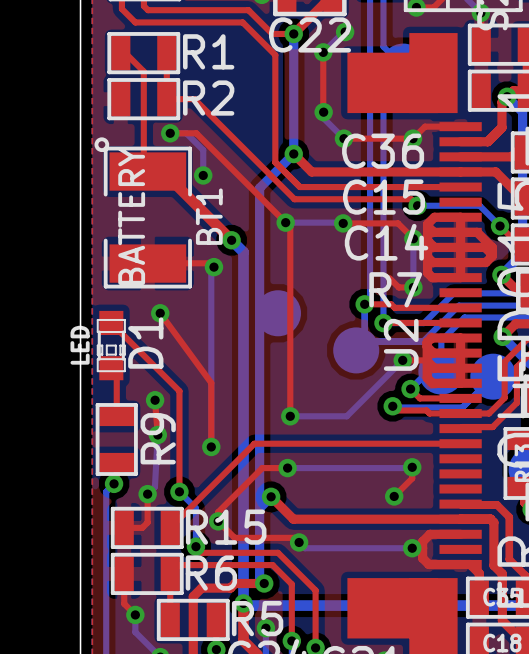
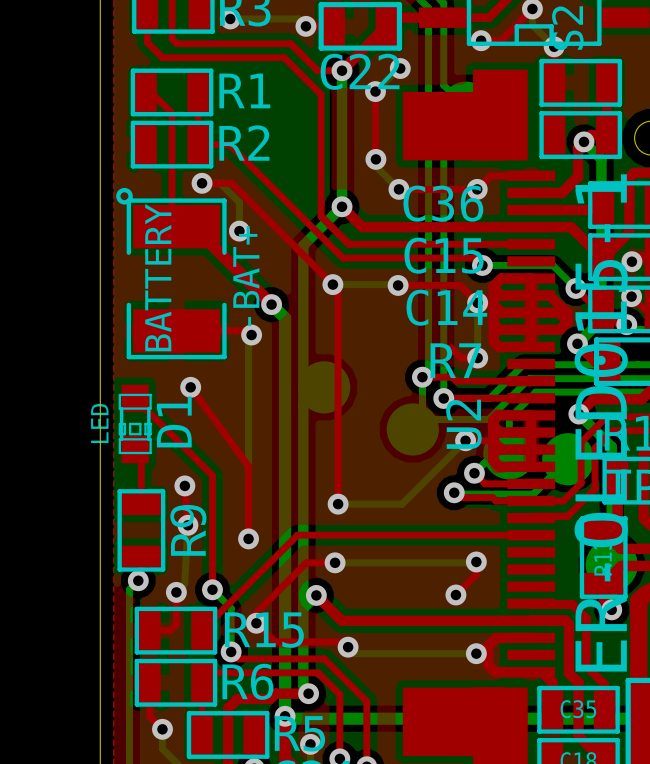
BT1 name: BT1 (209, 216) -> -BAT+ (246, 276)

